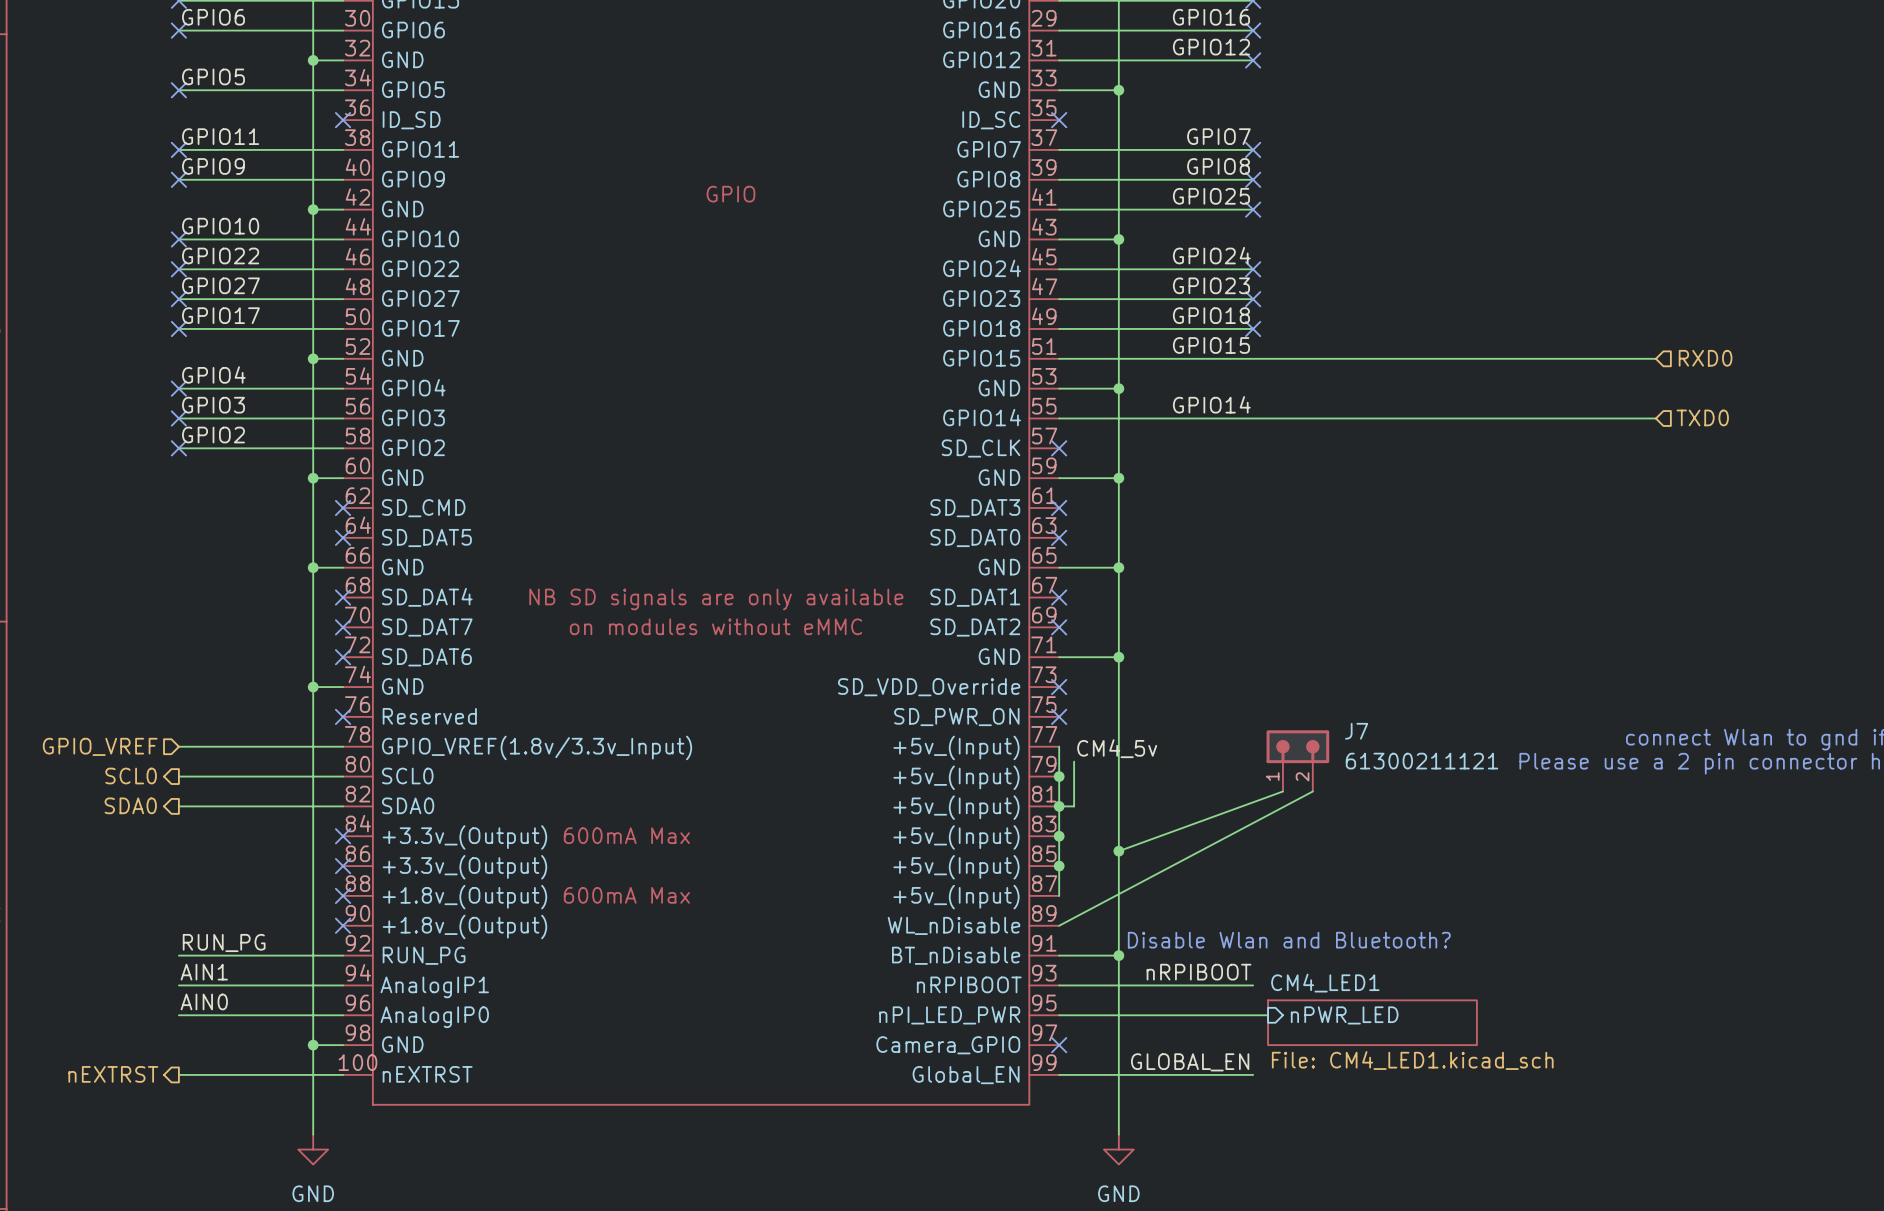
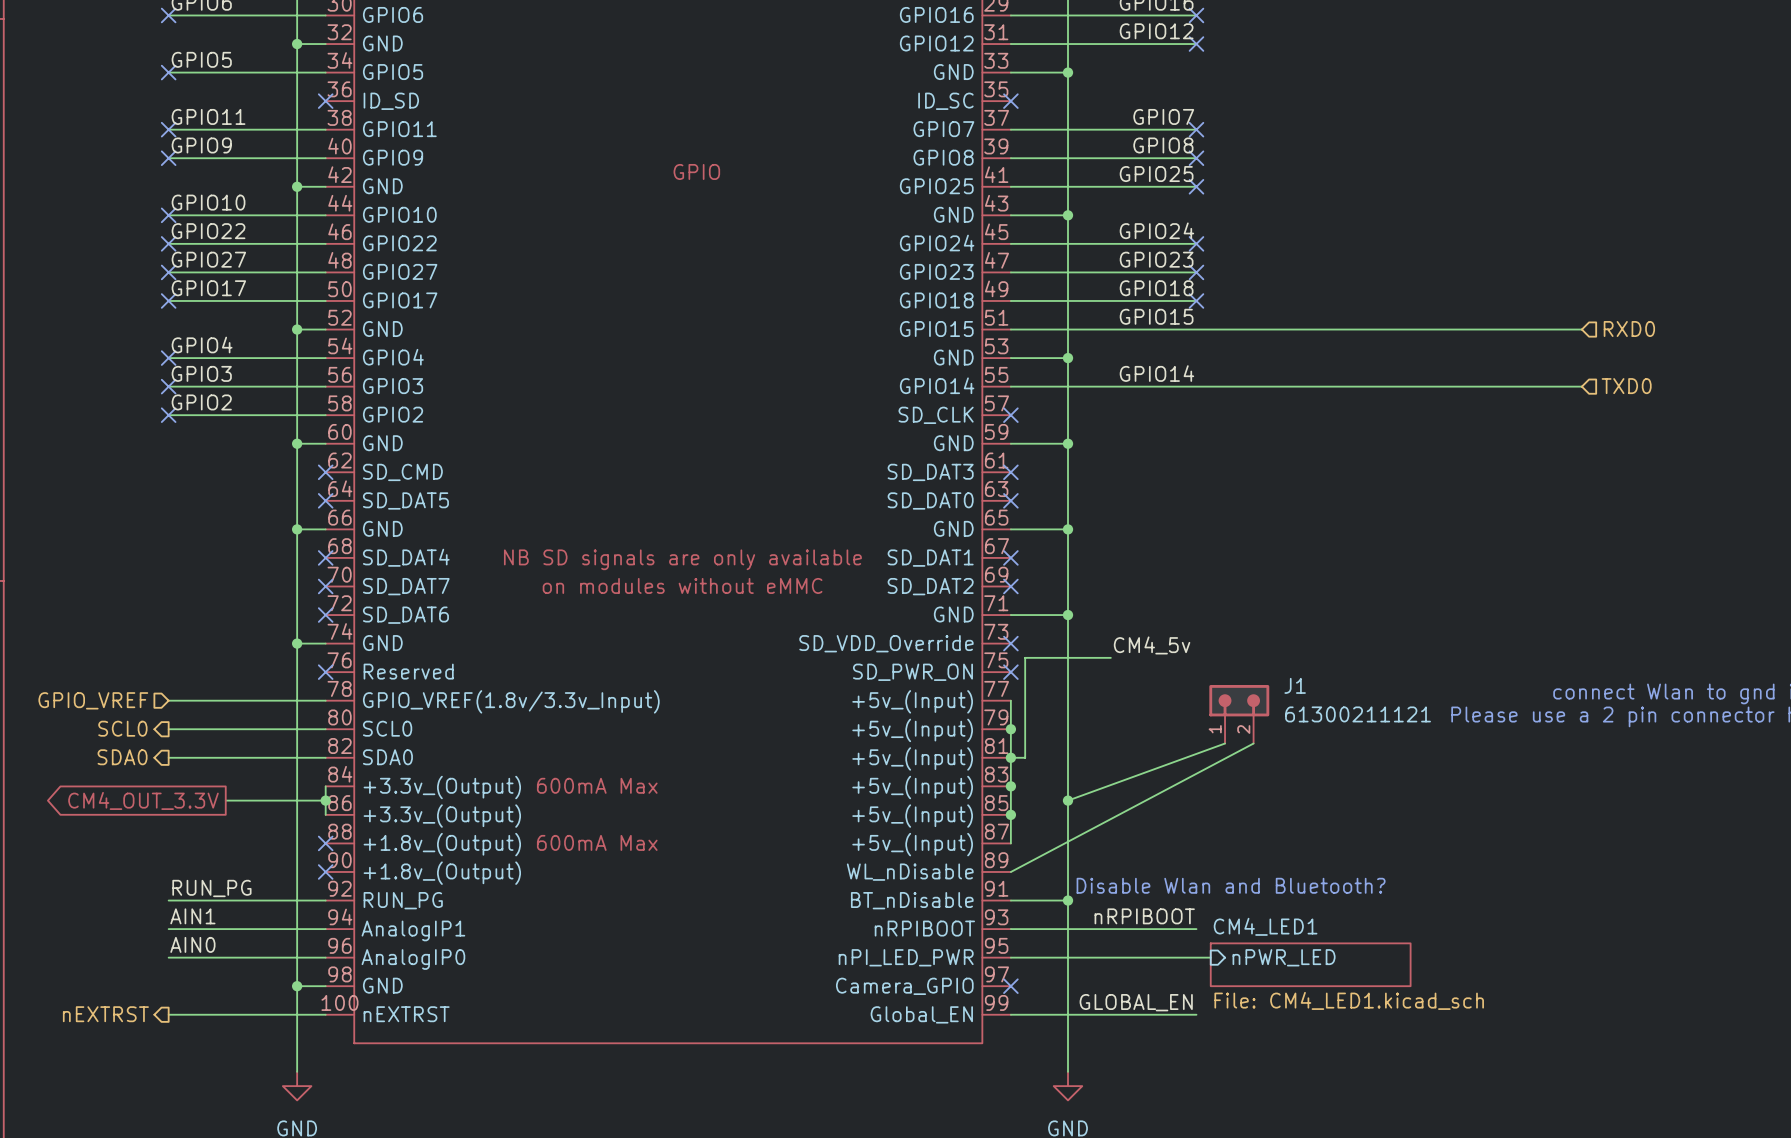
wire: none -> (1110, 657) (1025, 657) (1025, 714)
J7 name: J7 (1356, 731) -> J1 (1295, 685)
label position: CM4_5v (1117, 748) -> CM4_5v (1152, 645)
wire: none -> (325, 786) (325, 814)
no-connect mark: (343, 836) -> none
global label: none -> CM4_OUT_3.3V (143, 800)
wire: none -> (225, 800) (325, 800)
junction: none -> (325, 800)
no-connect mark: (343, 866) -> none

